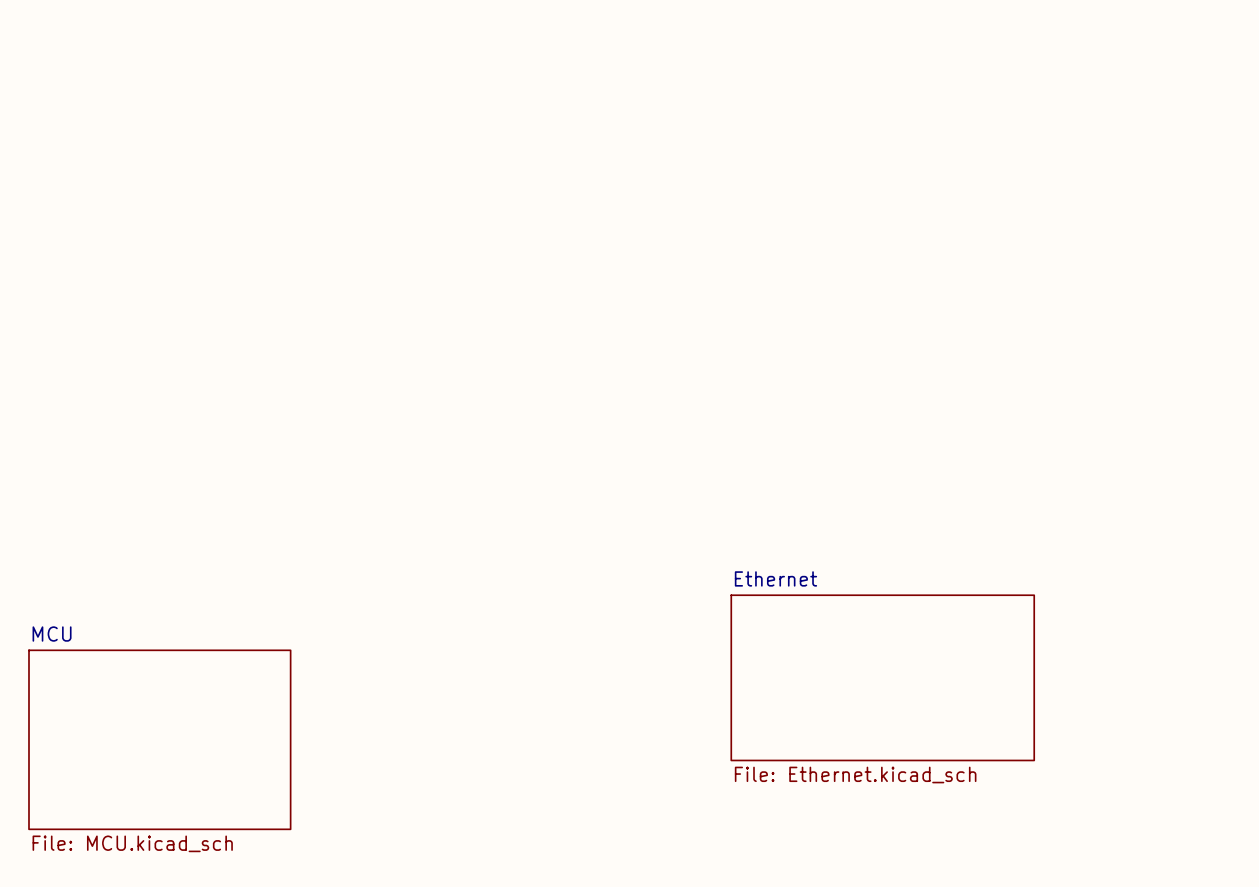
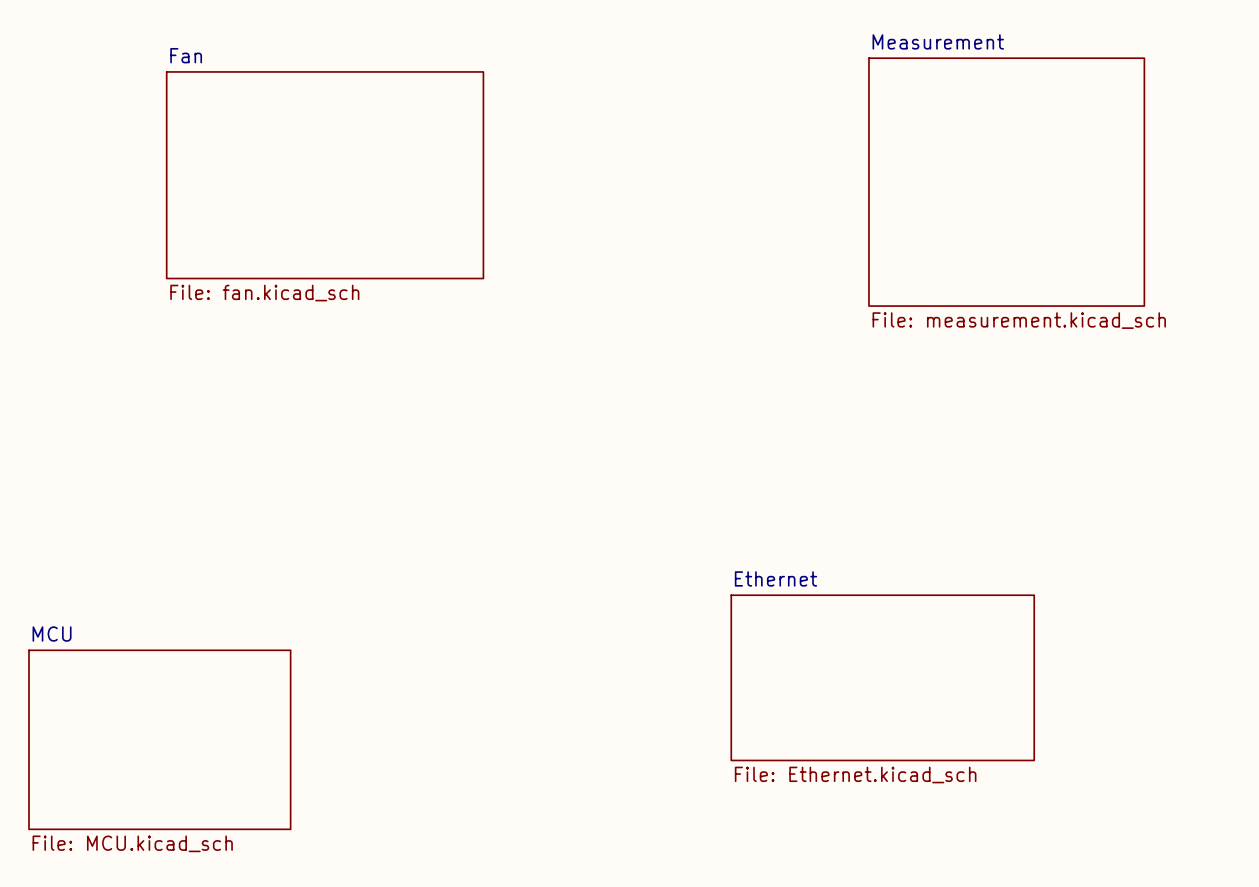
sheet Fan: none -> File: fan.kicad_sch (325, 175)
sheet Measurement: none -> File: measurement.kicad_sch (1006, 182)

